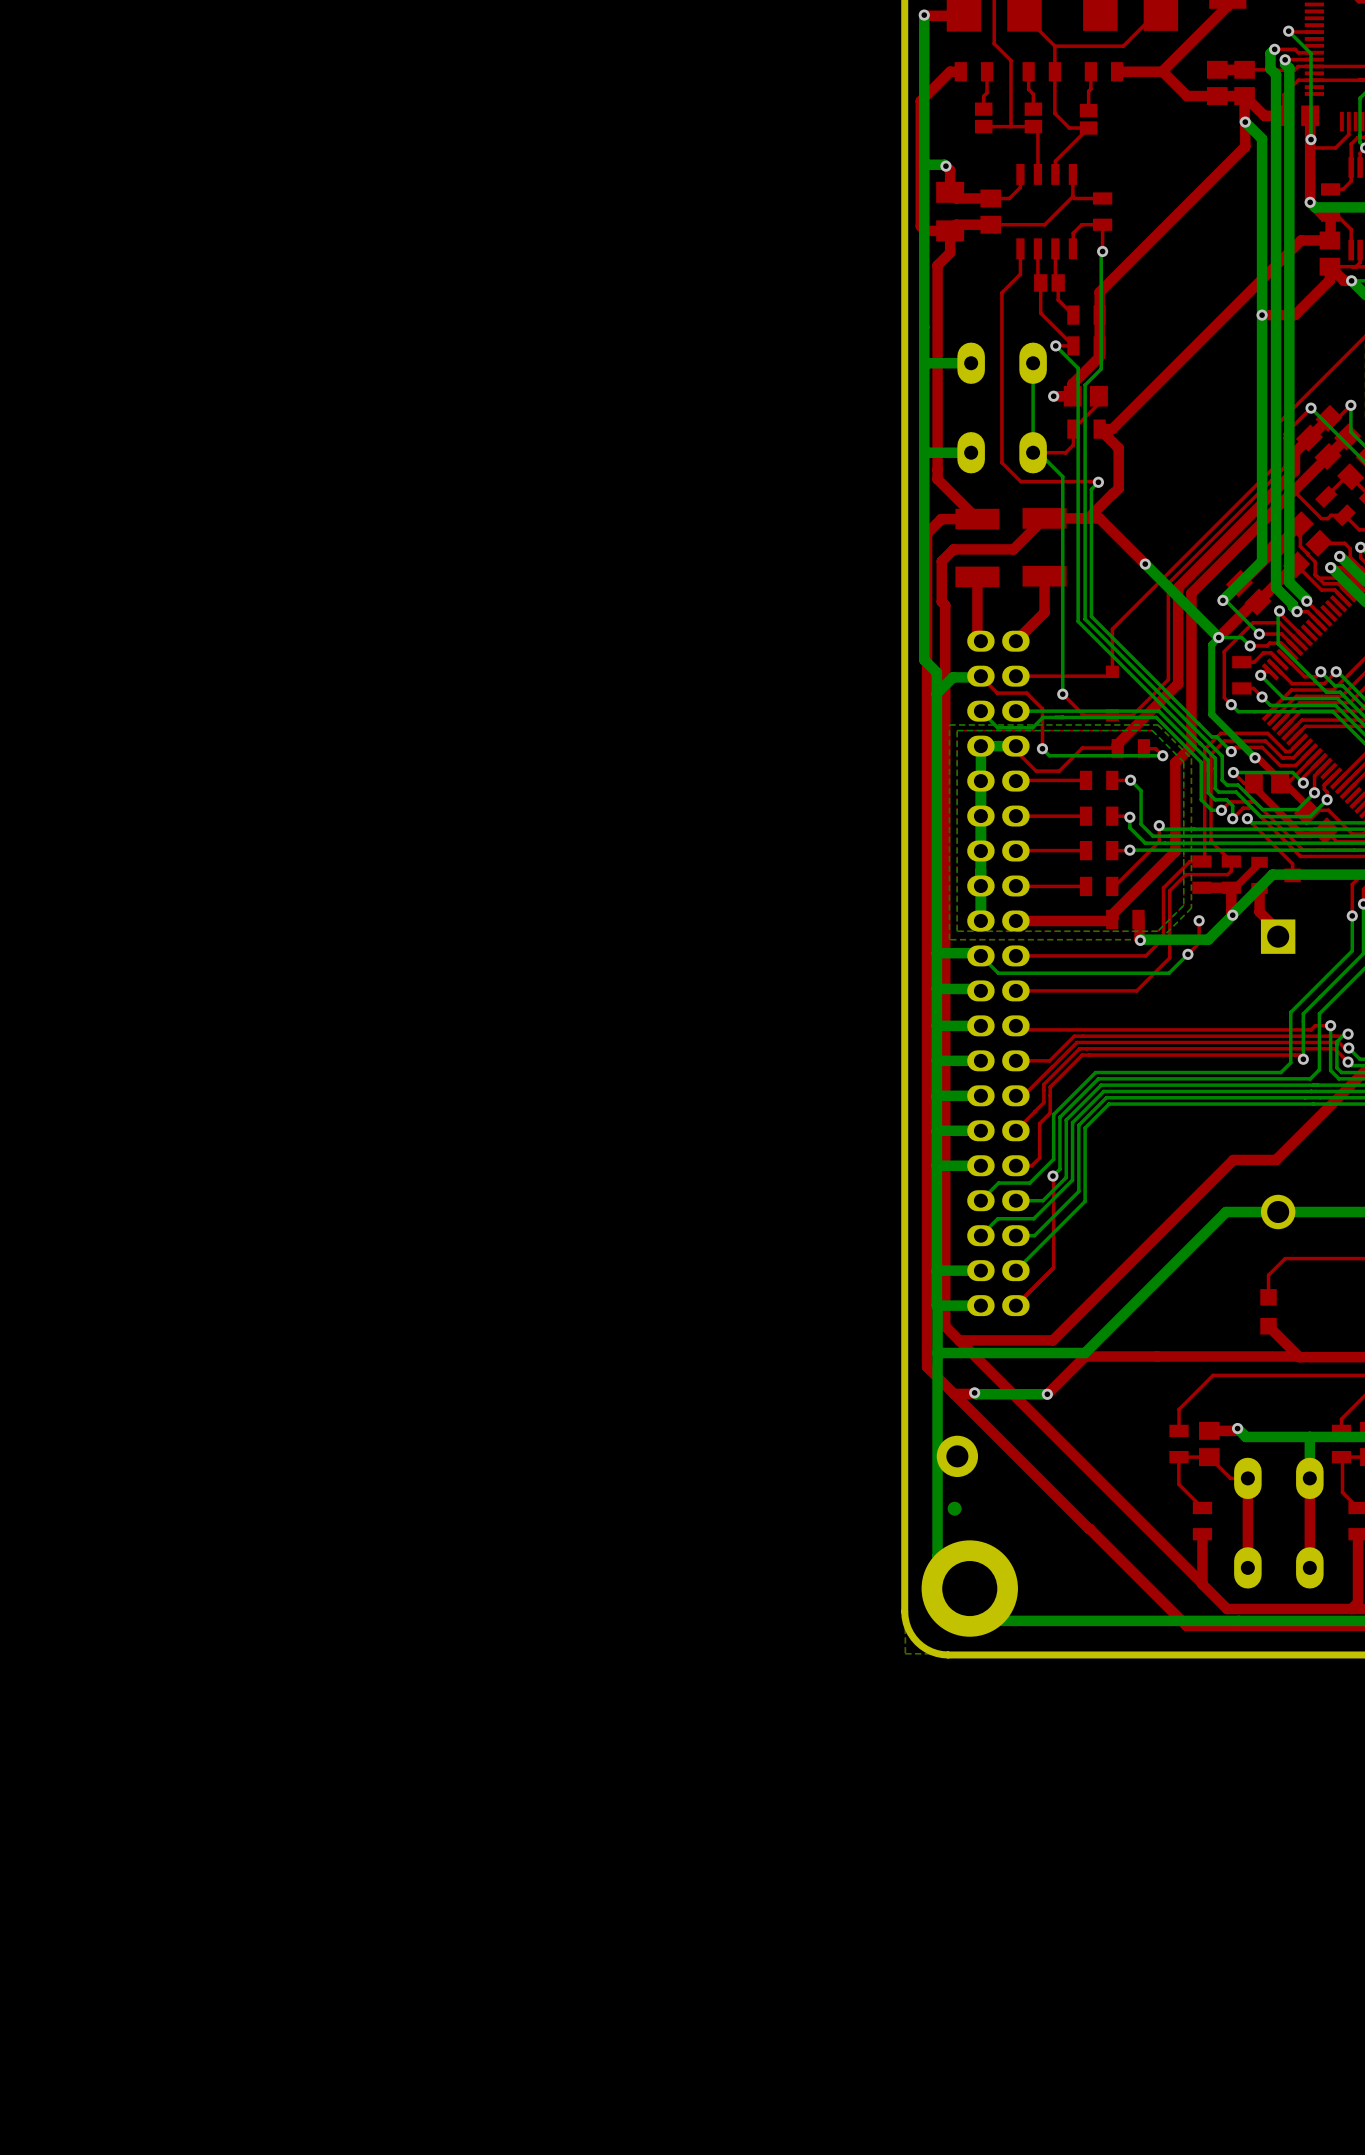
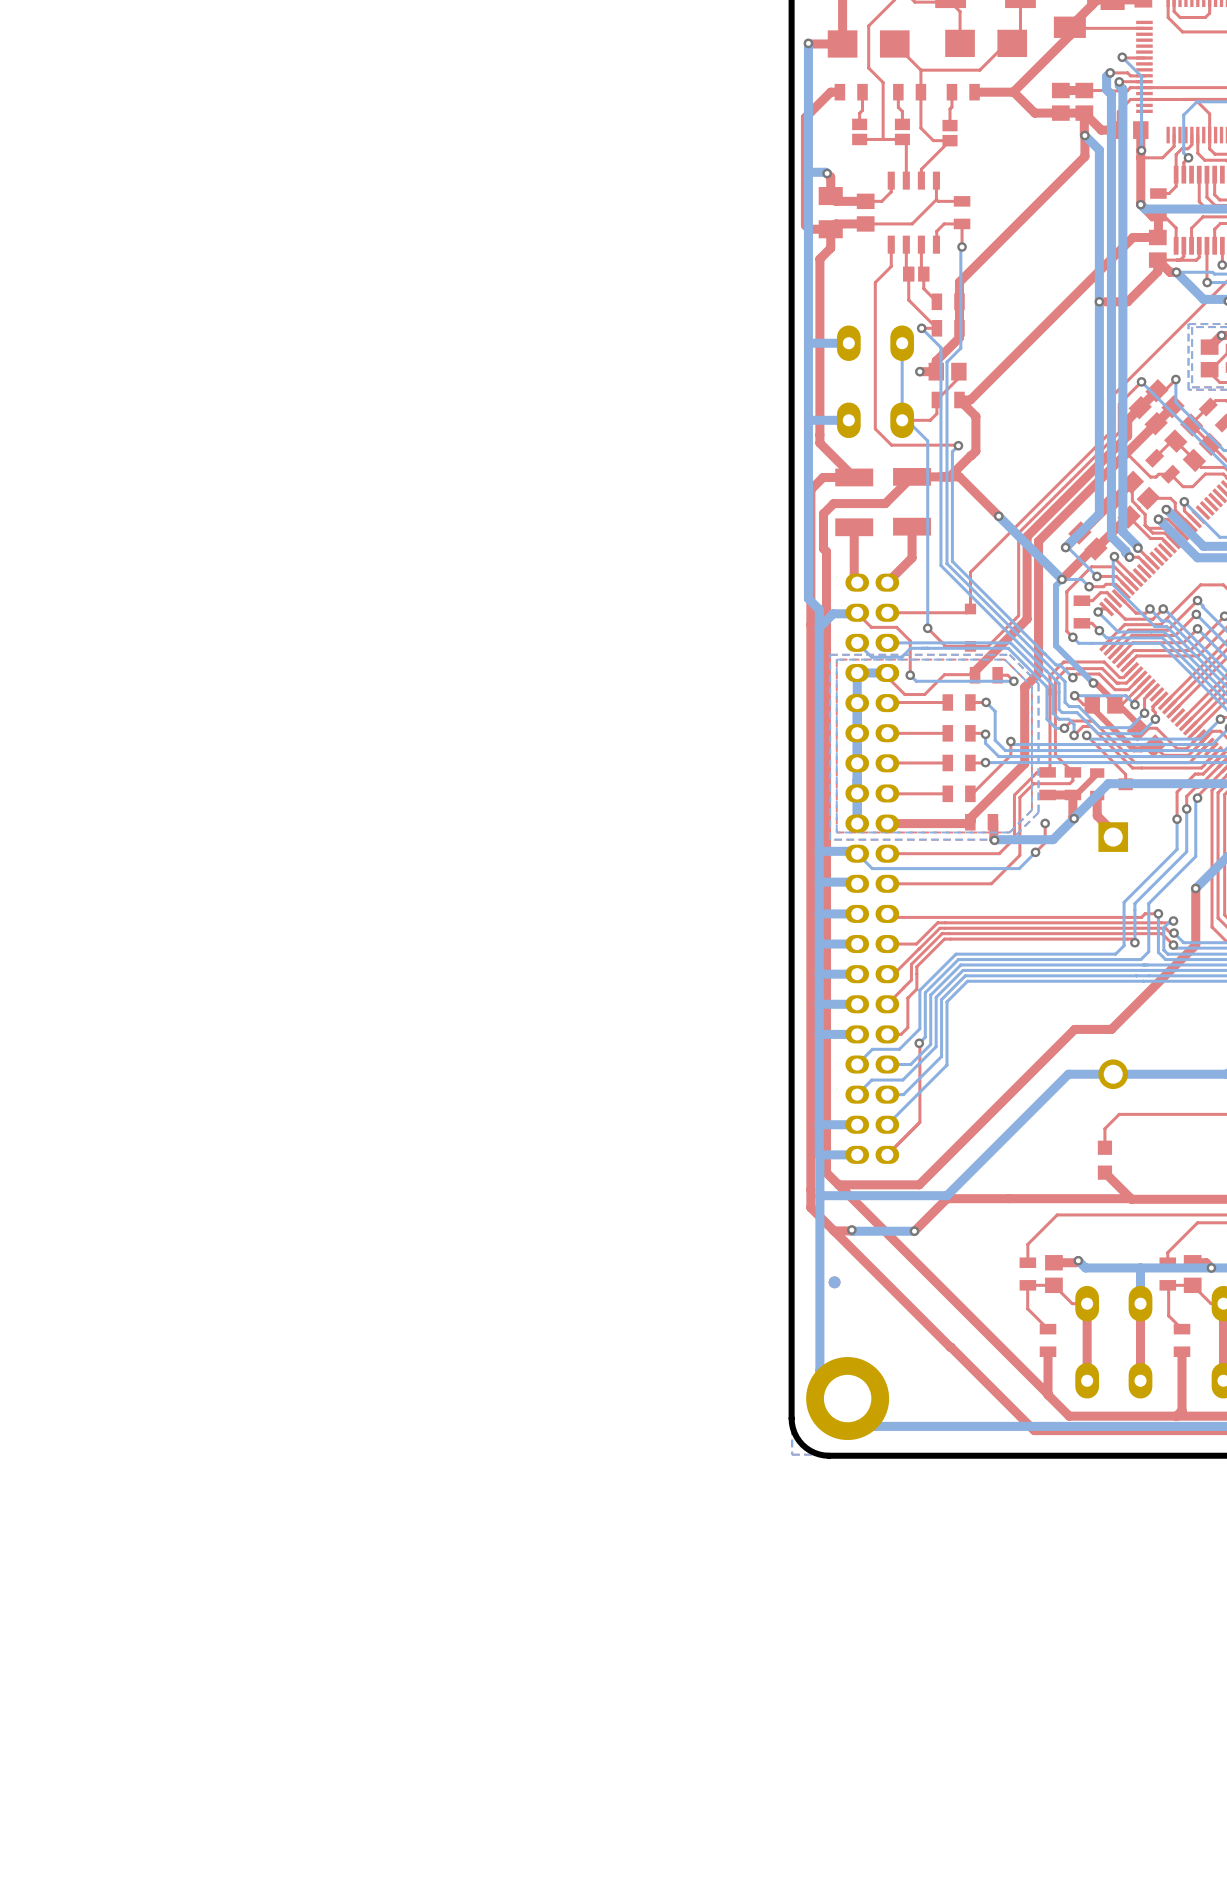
part: (957, 1456) -> none
part position: (954, 1508) -> (834, 1282)

